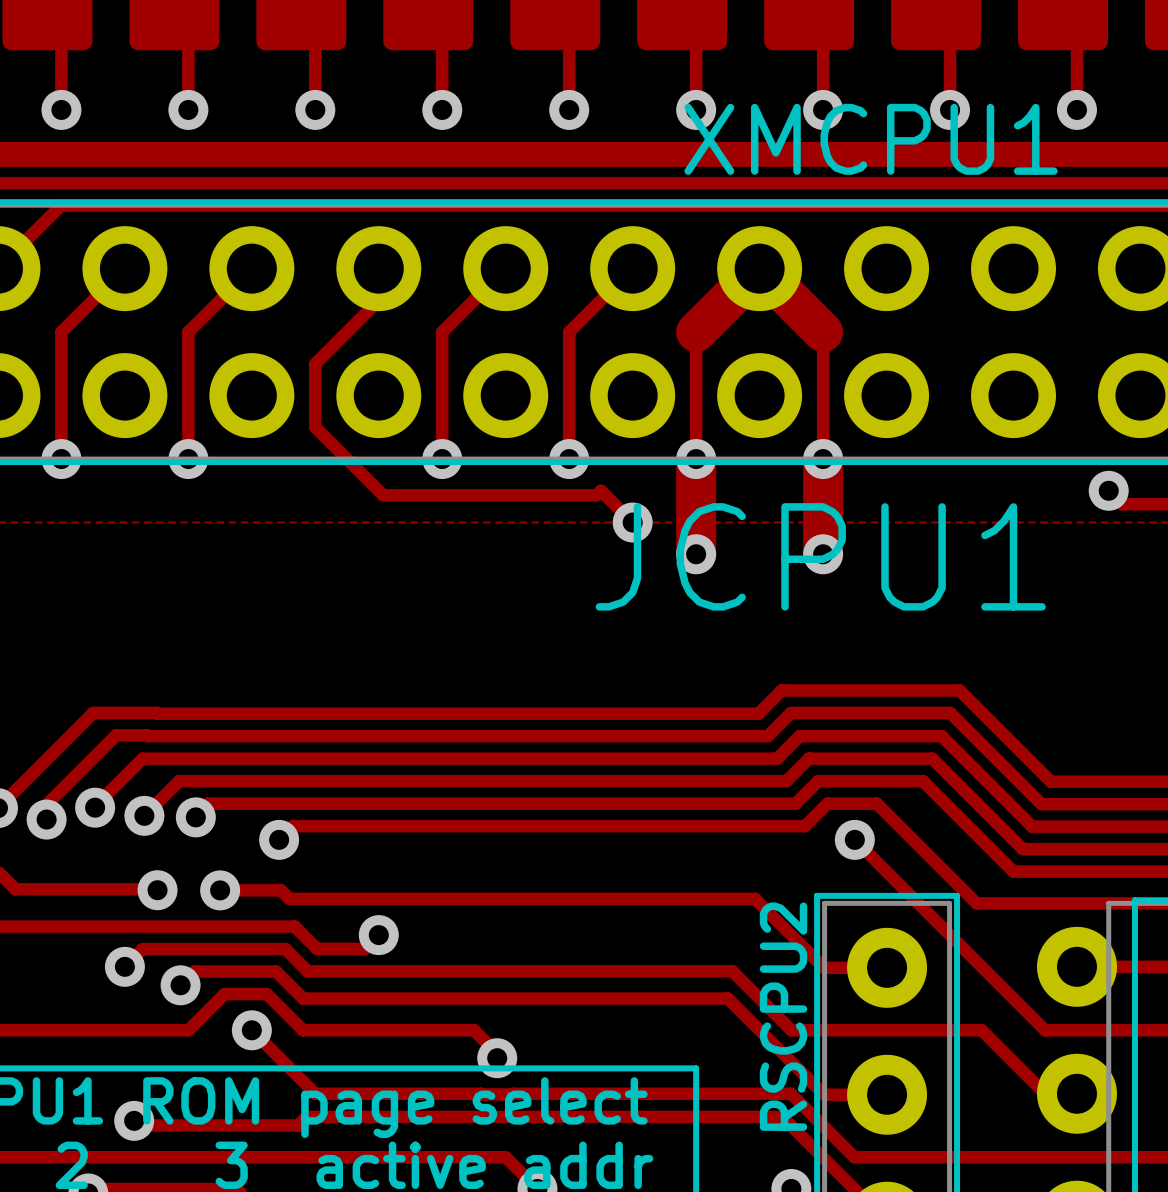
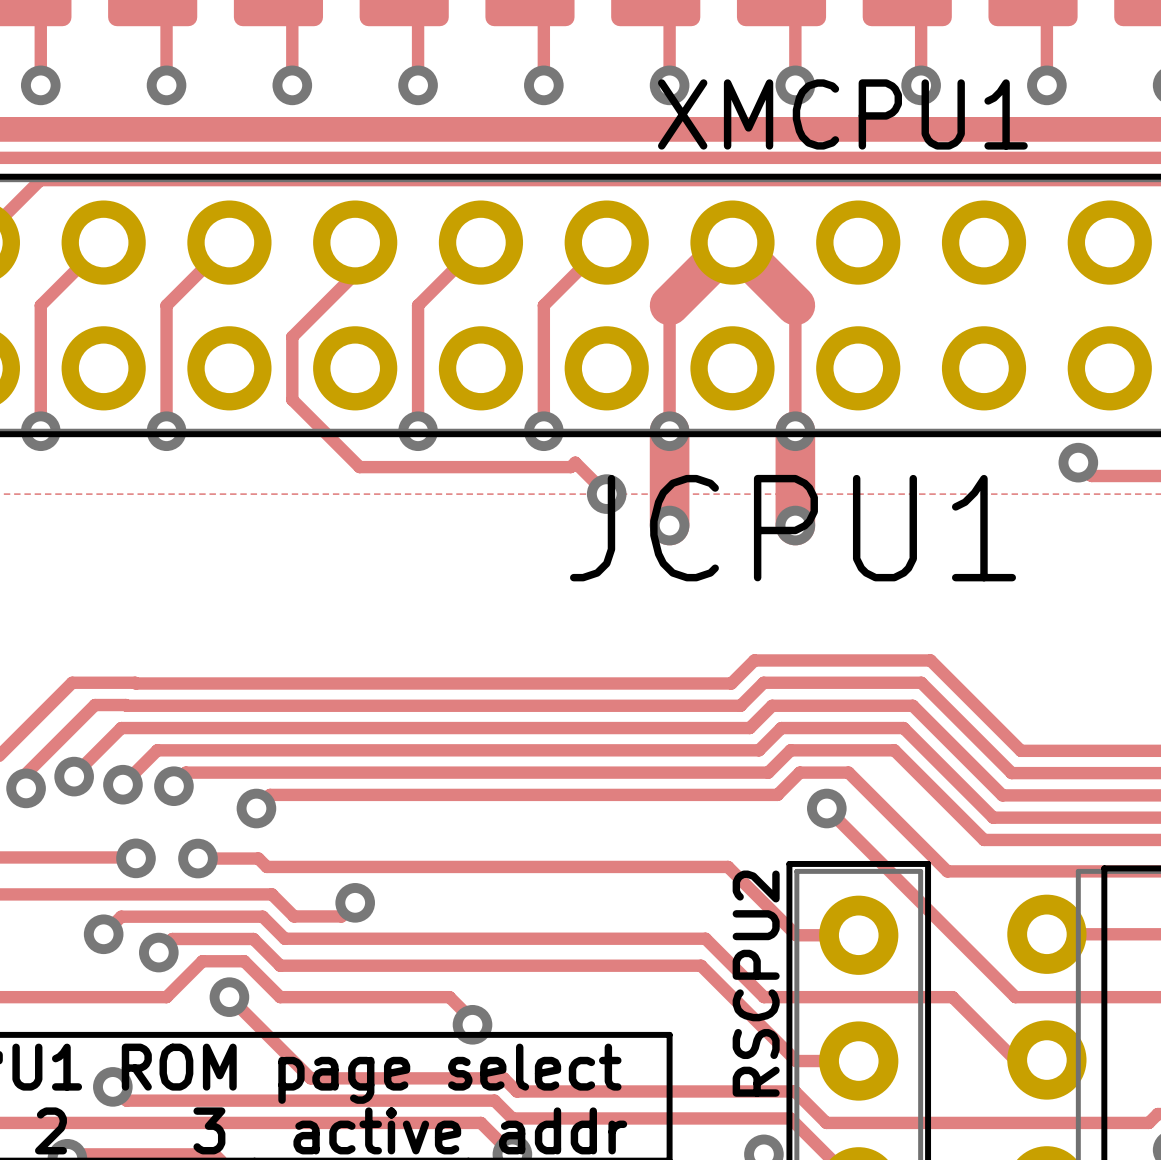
track: (315, 1093) (481, 1093) -> none
track: (512, 1093) (790, 1093) (822, 1125) -> (292, 1060) (310, 1078) (503, 1078) (516, 1091) (794, 1091)
track: (482, 1094) (512, 1094) -> none
track: (138, 1125) (298, 1125) (306, 1116) (782, 1116) (818, 1152) -> (117, 1091) (126, 1100) (494, 1100) (512, 1118) (790, 1118)

